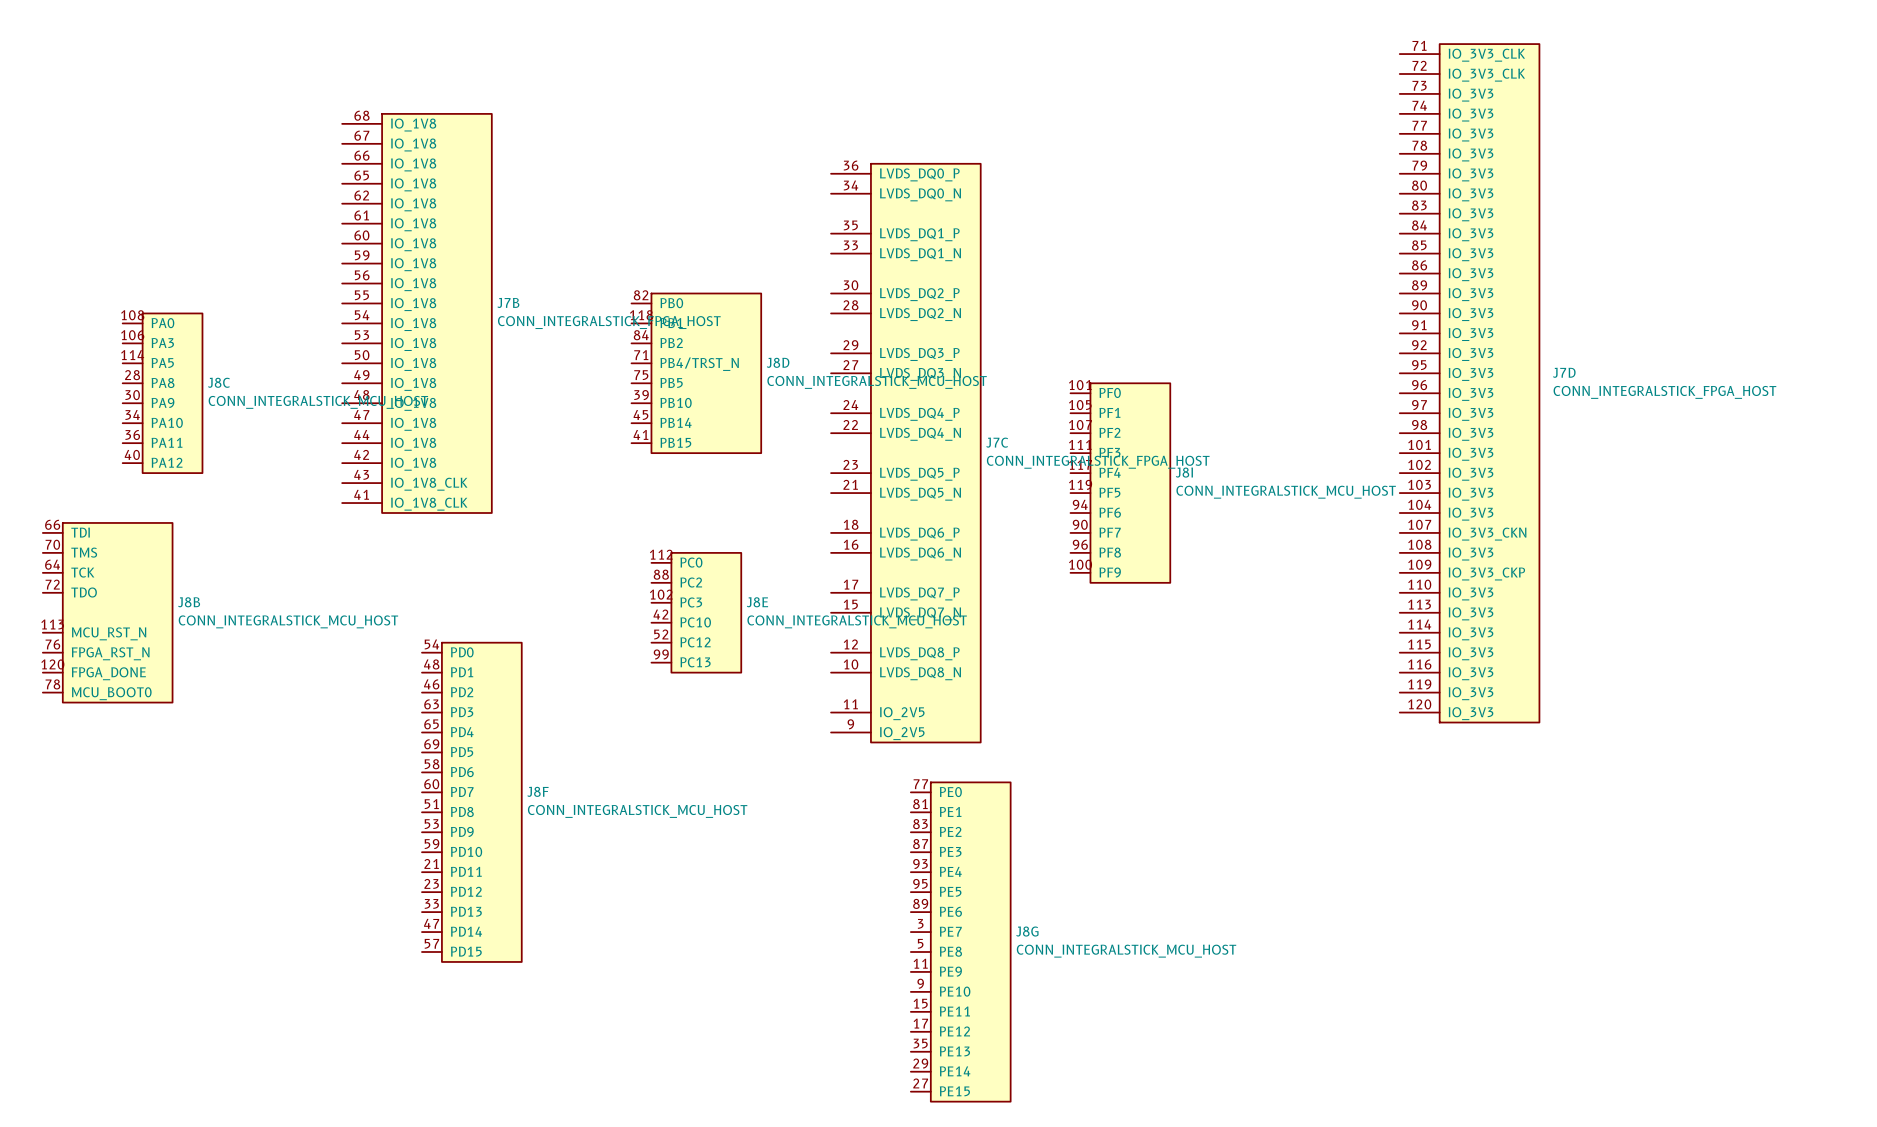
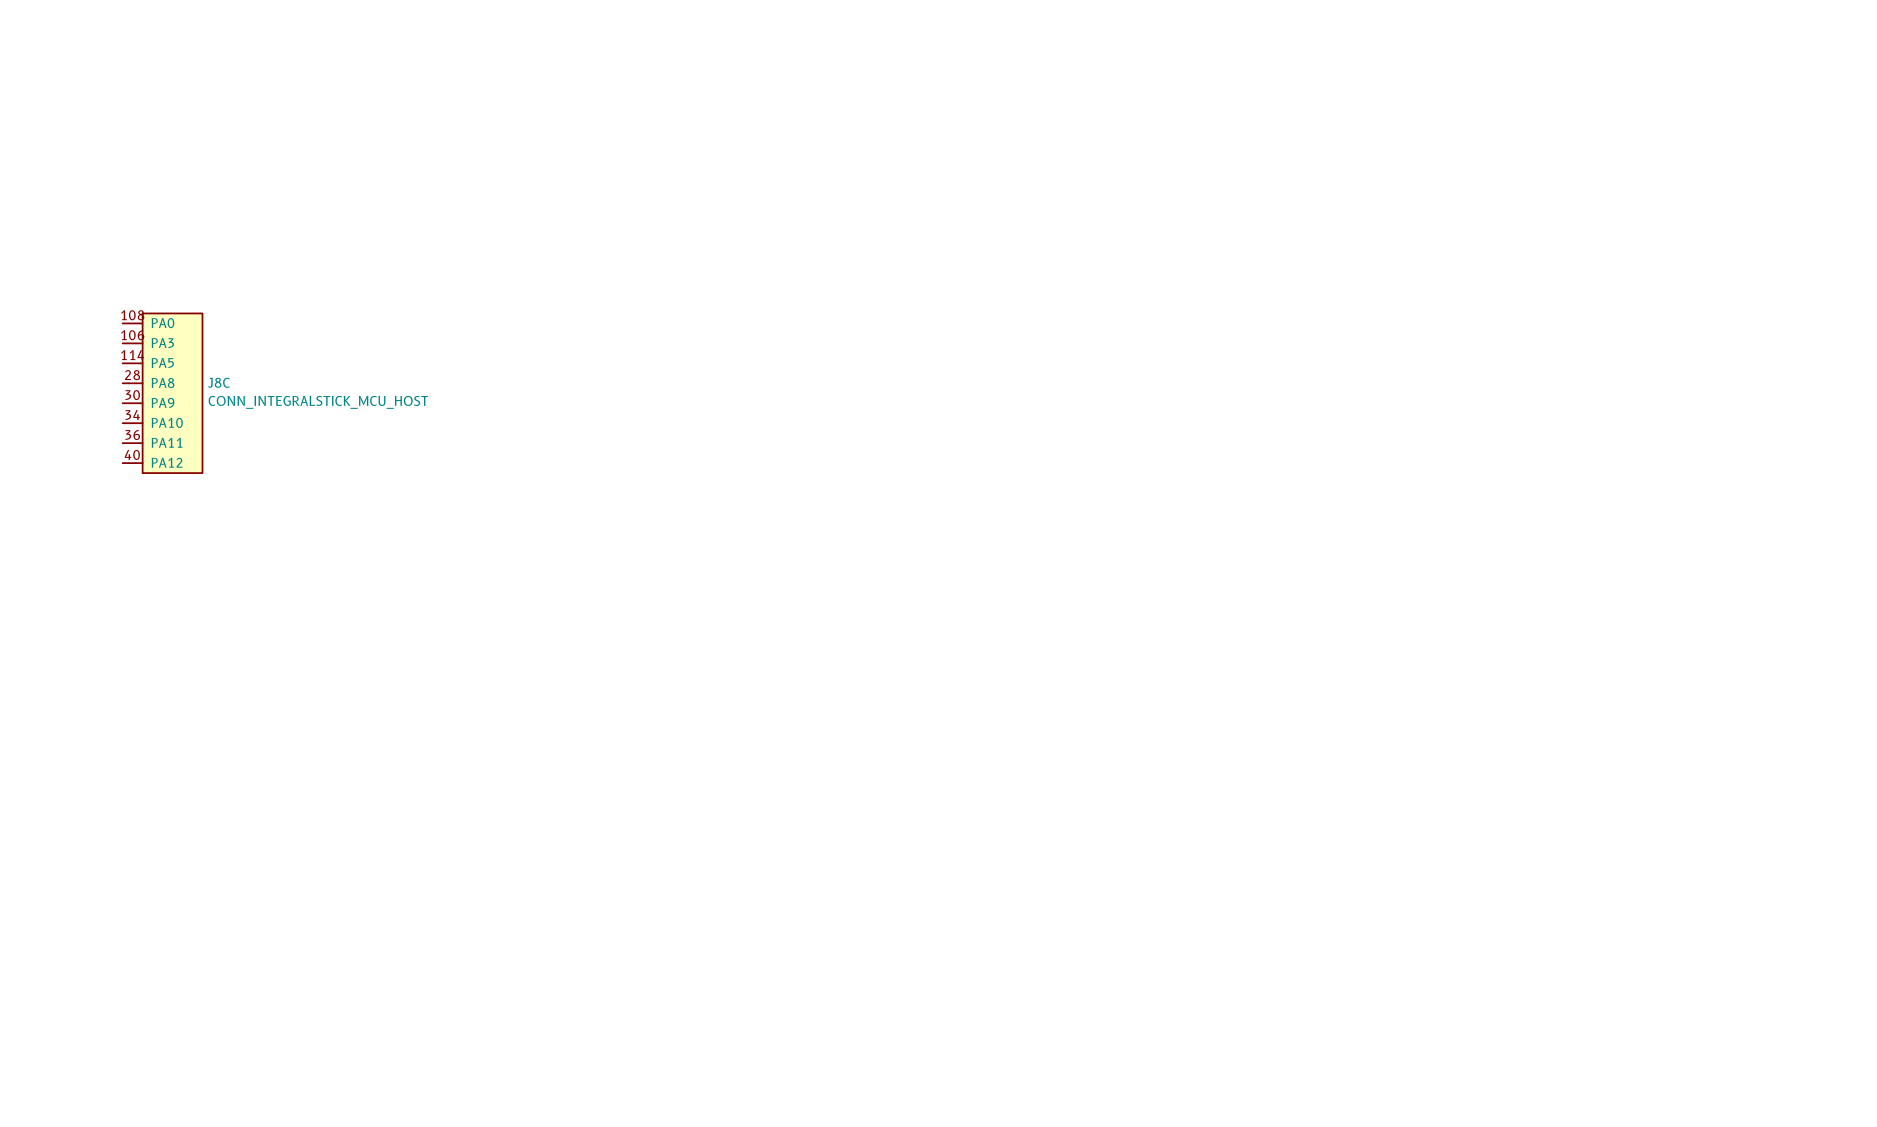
J7B: CONN_INTEGRALSTICK_FPGA_HOST (416, 313) -> none
J8D: CONN_INTEGRALSTICK_MCU_HOST (696, 373) -> none
J7D: CONN_INTEGRALSTICK_FPGA_HOST (1469, 383) -> none
J7C: CONN_INTEGRALSTICK_FPGA_HOST (905, 453) -> none
J8I: CONN_INTEGRALSTICK_MCU_HOST (1120, 483) -> none
J8B: CONN_INTEGRALSTICK_MCU_HOST (107, 612) -> none
J8E: CONN_INTEGRALSTICK_MCU_HOST (696, 612) -> none
J8F: CONN_INTEGRALSTICK_MCU_HOST (471, 802) -> none
J8G: CONN_INTEGRALSTICK_MCU_HOST (960, 942) -> none

